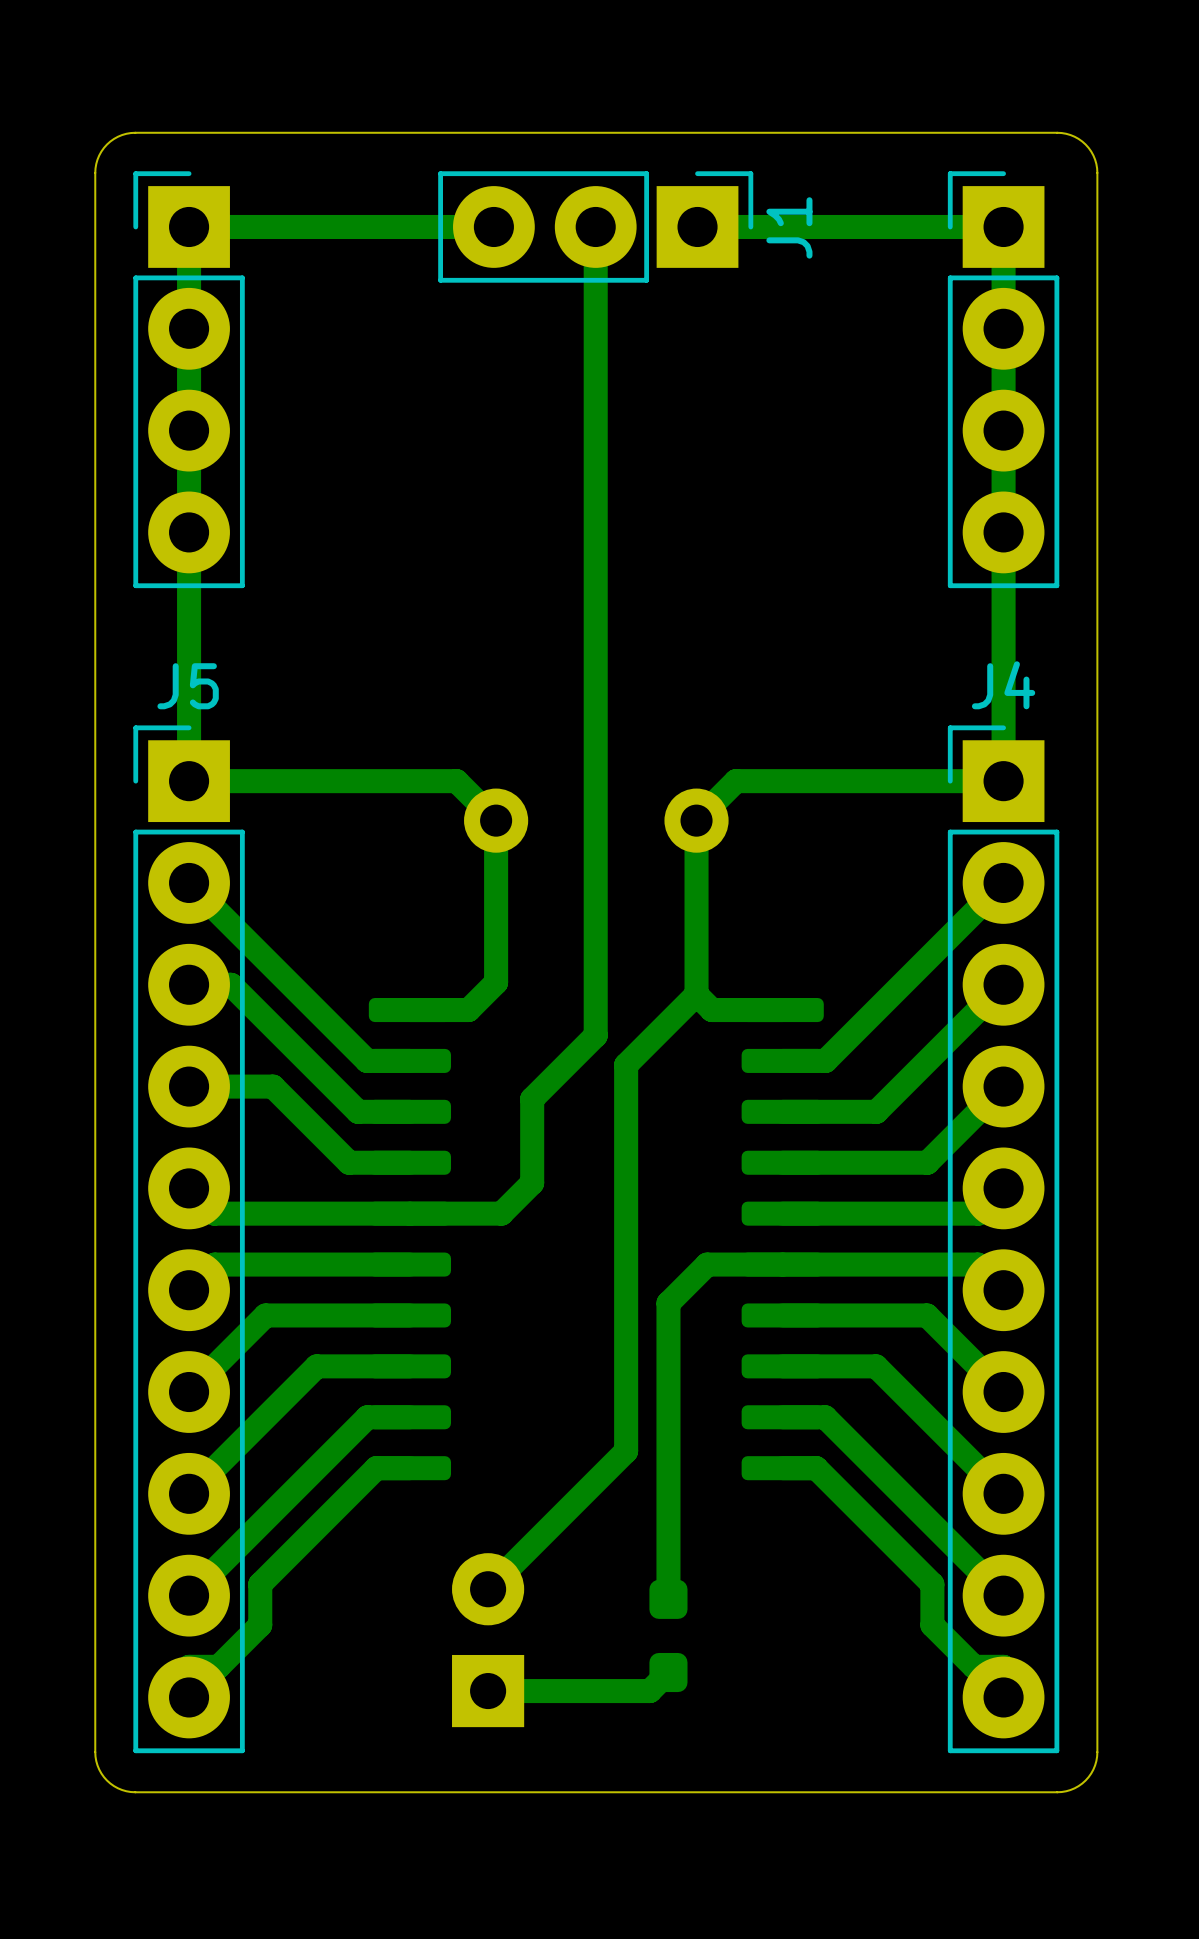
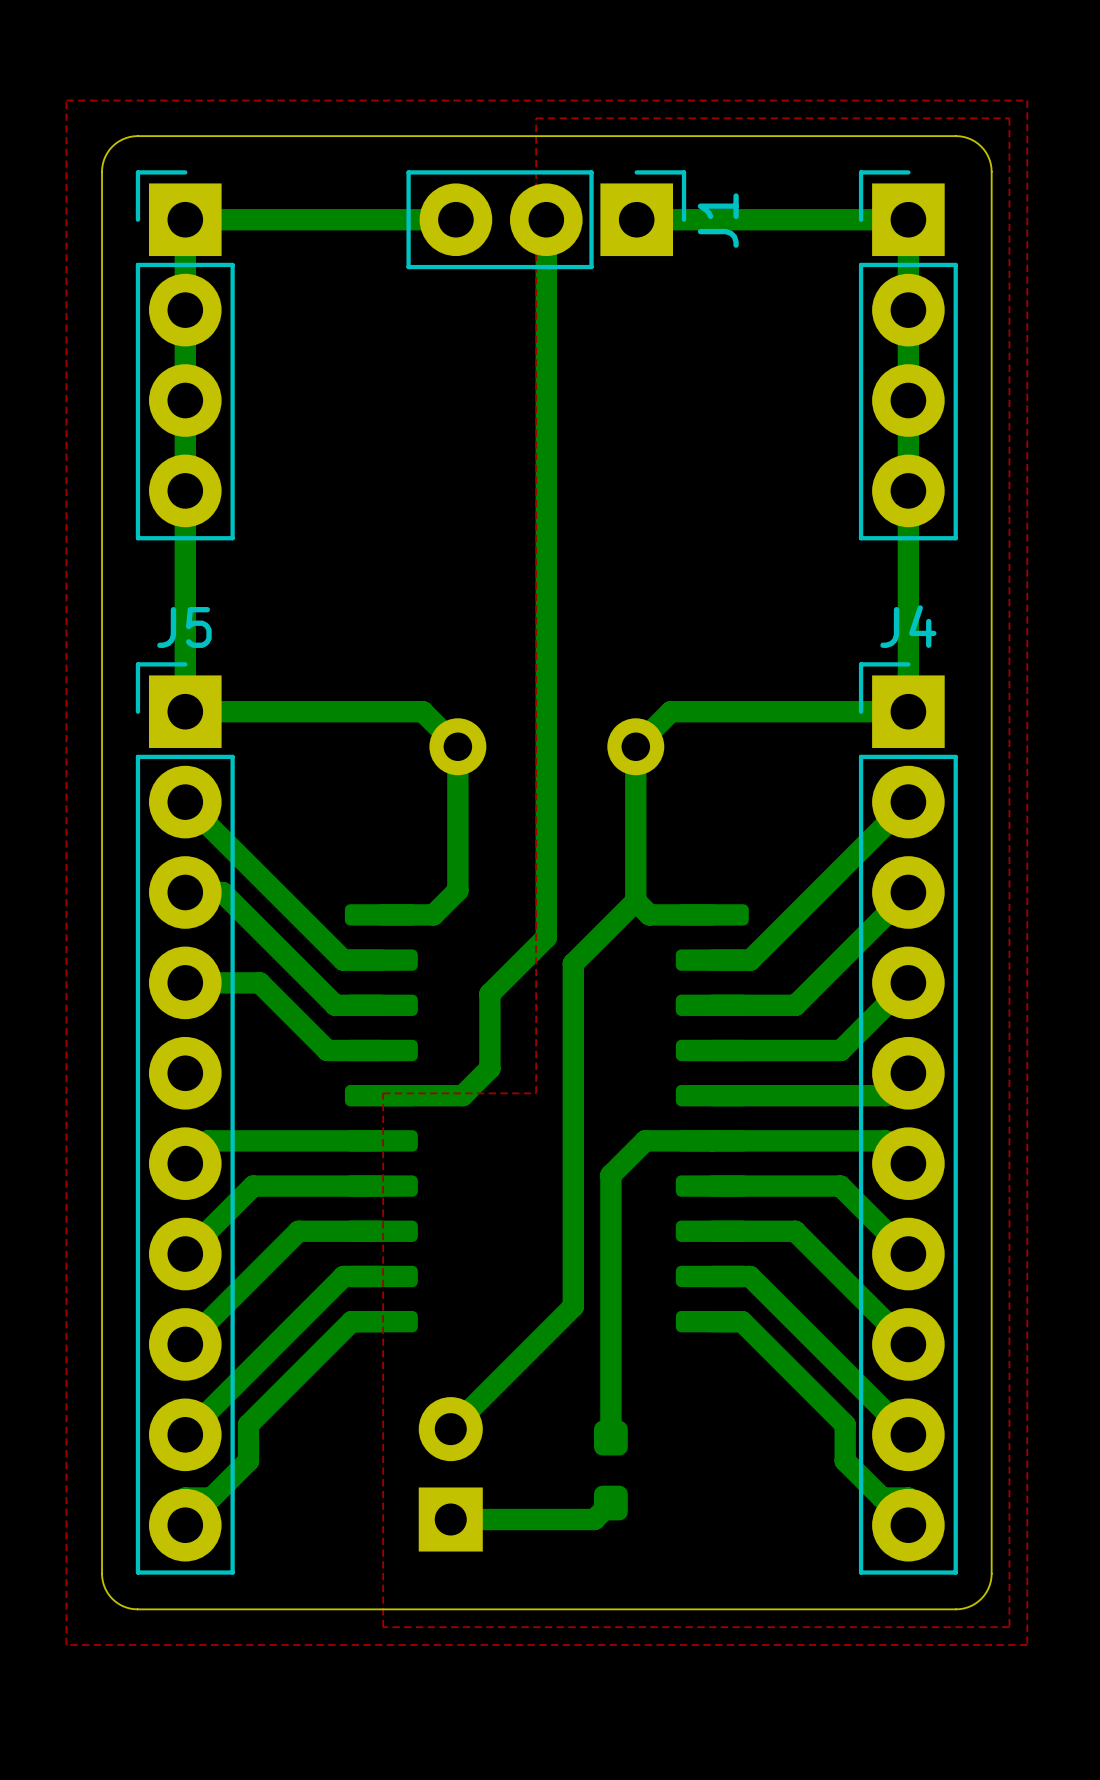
top zone outline: none -> (66, 100) (1027, 100) (1027, 1644) (66, 1644) (66, 100)
top zone outline: none -> (536, 118) (1009, 118) (1009, 1627) (383, 1627) (383, 1093) (536, 1093) (536, 118)
bottom track: (189, 1188) (214, 1213) (409, 1213) -> none

